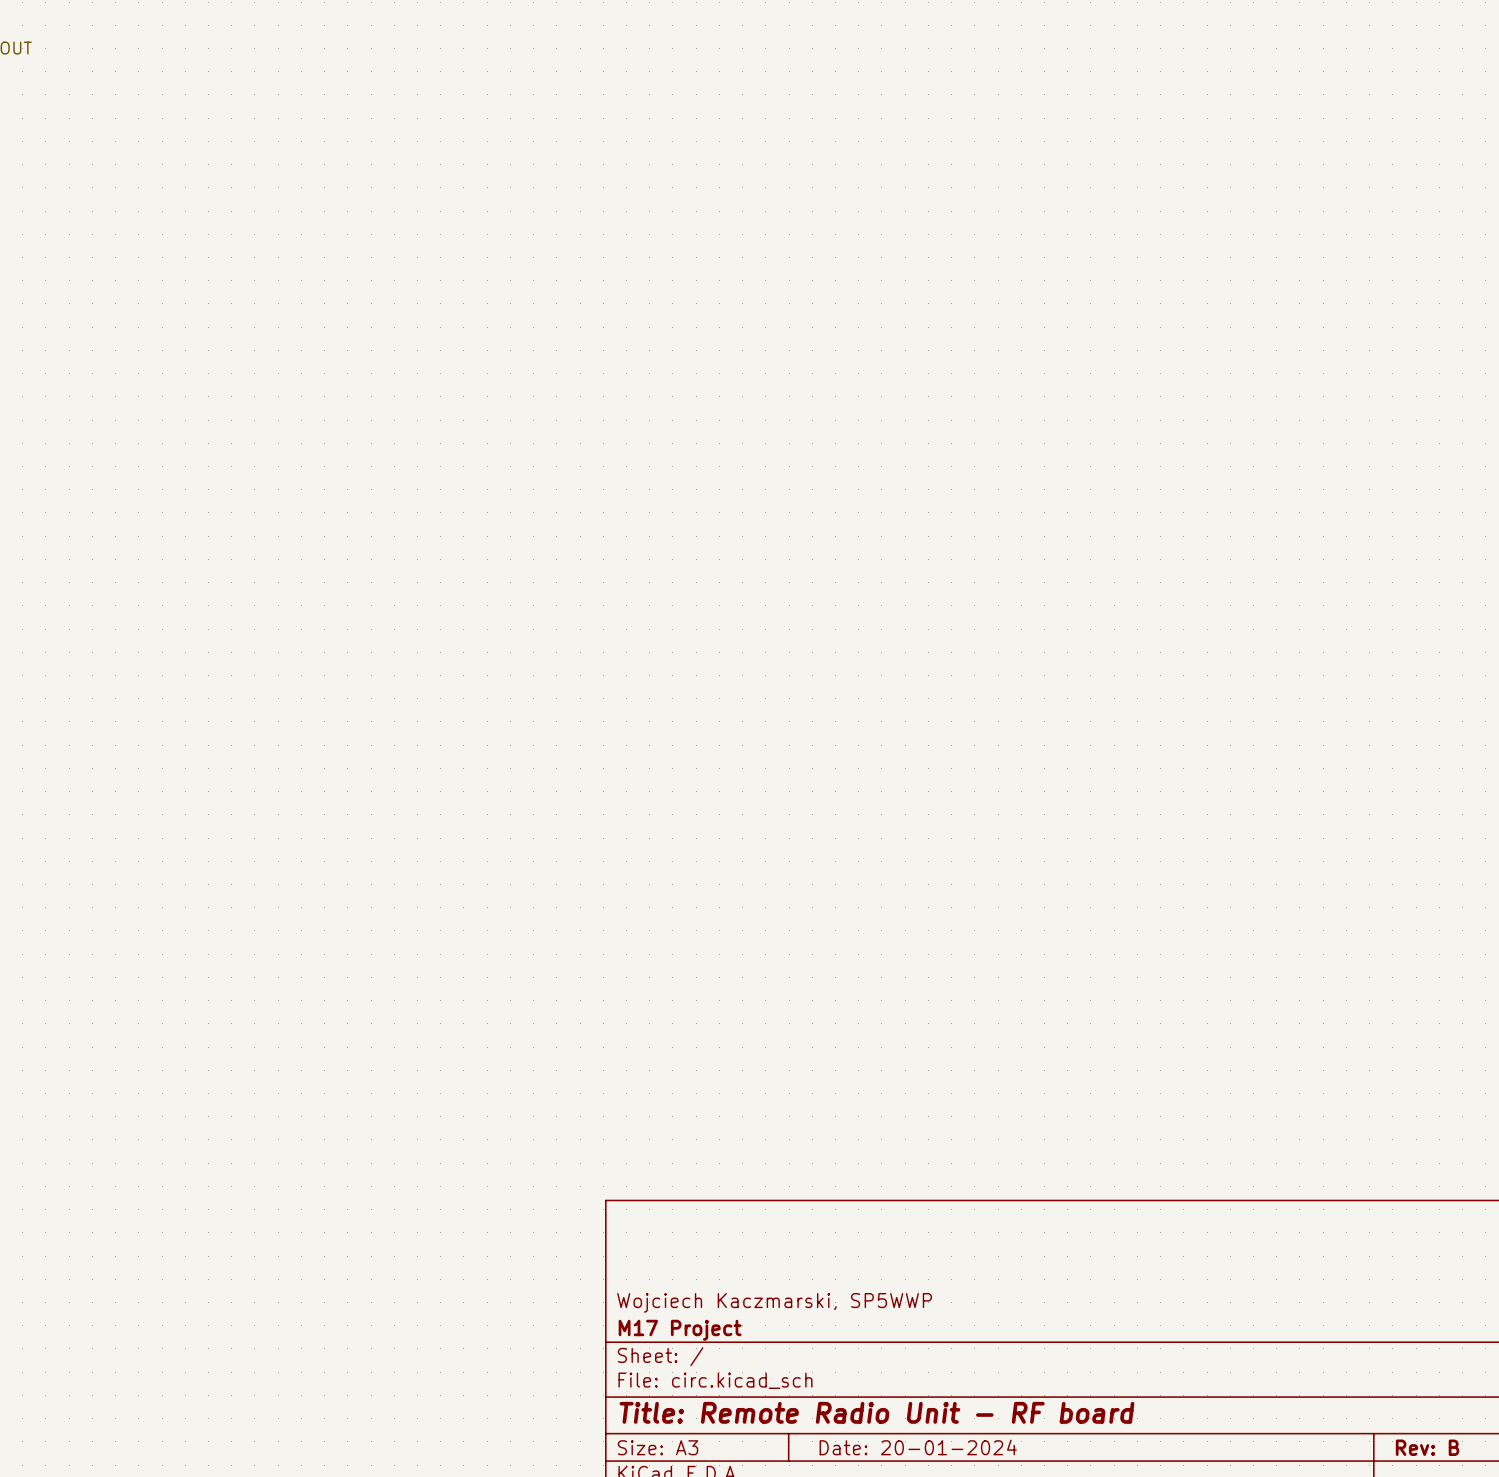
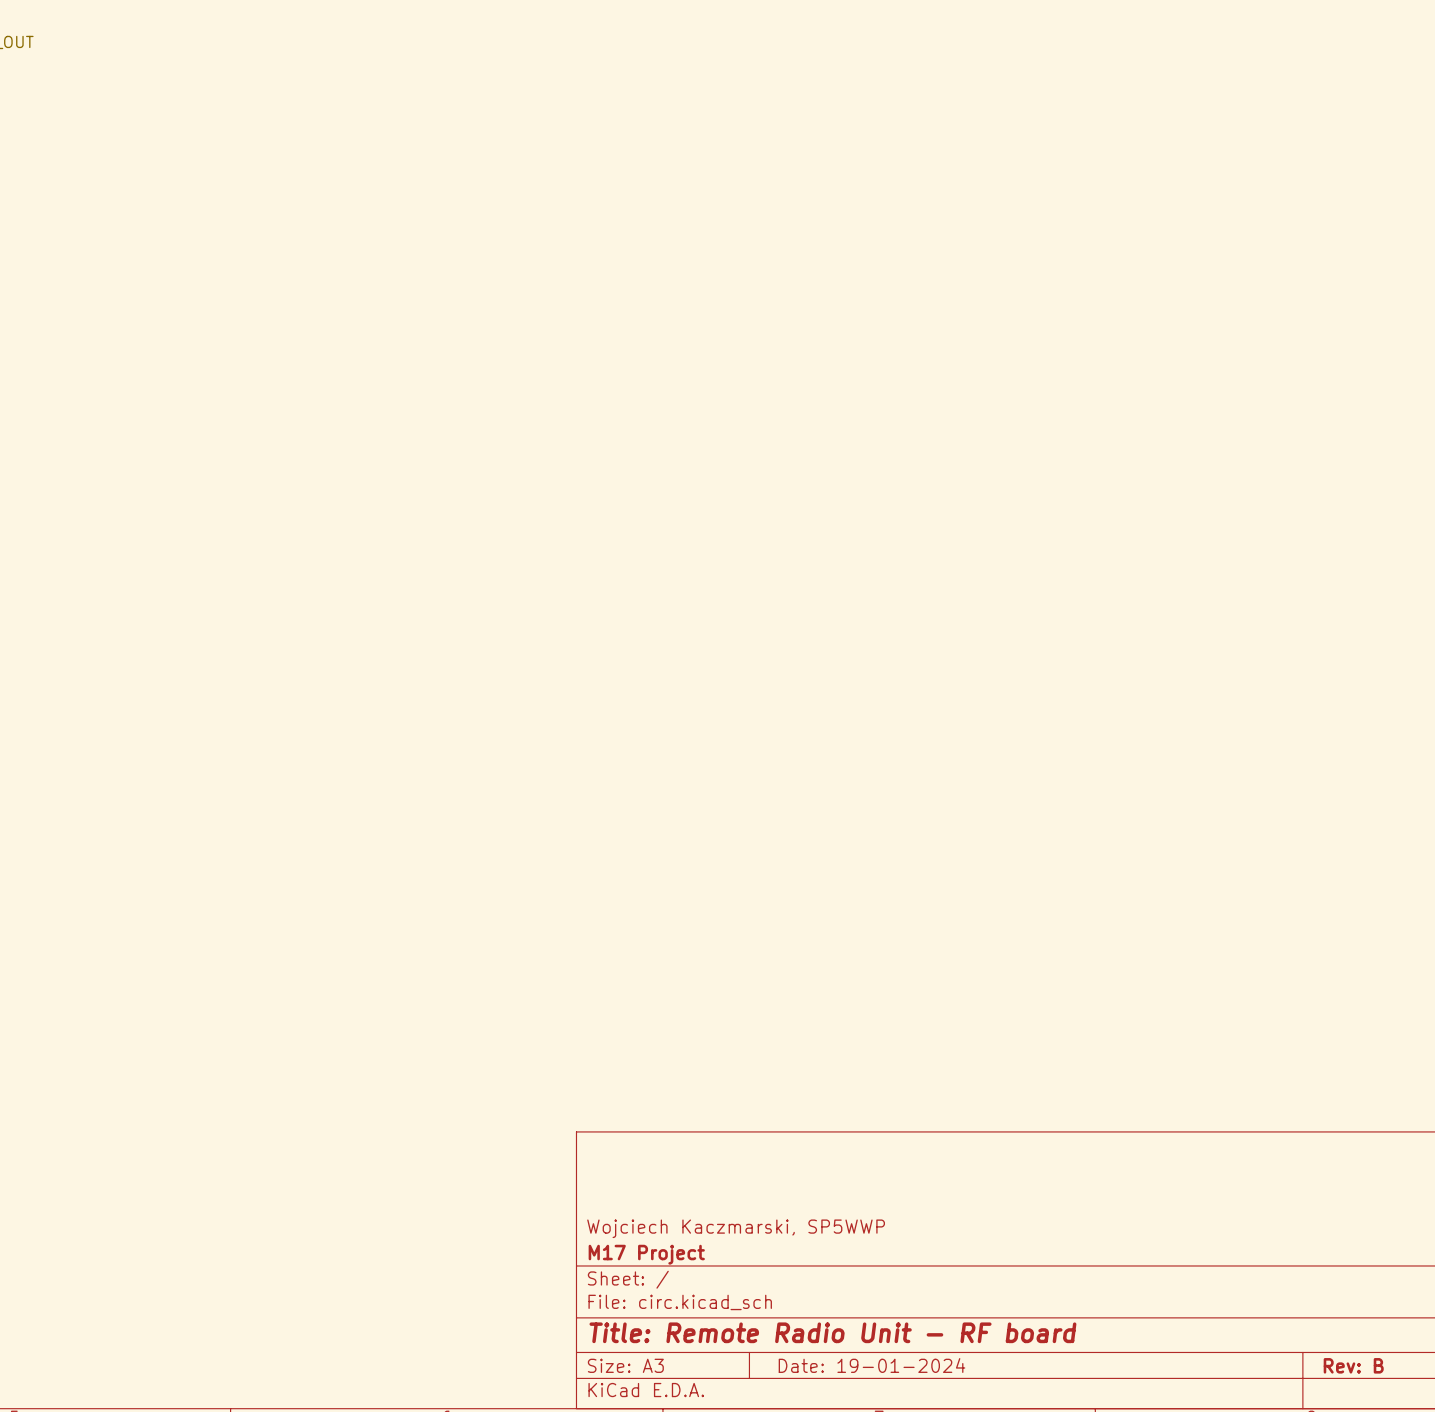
title block: Date: 20-01-2024 (918, 1447) -> Date: 19-01-2024 (871, 1365)

